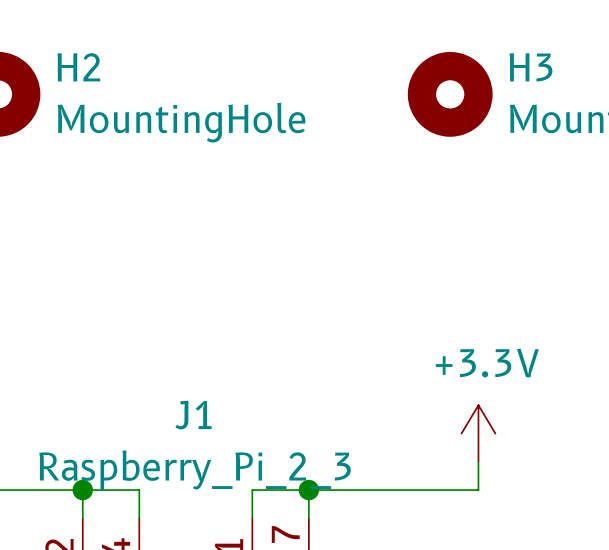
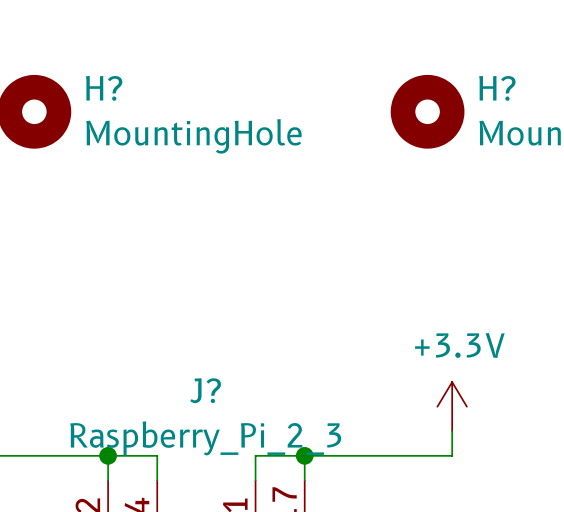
H2 name: H2 (78, 67) -> H? (104, 88)
H3 name: H3 (530, 67) -> H? (497, 88)
J1 name: J1 (193, 415) -> J? (205, 390)

